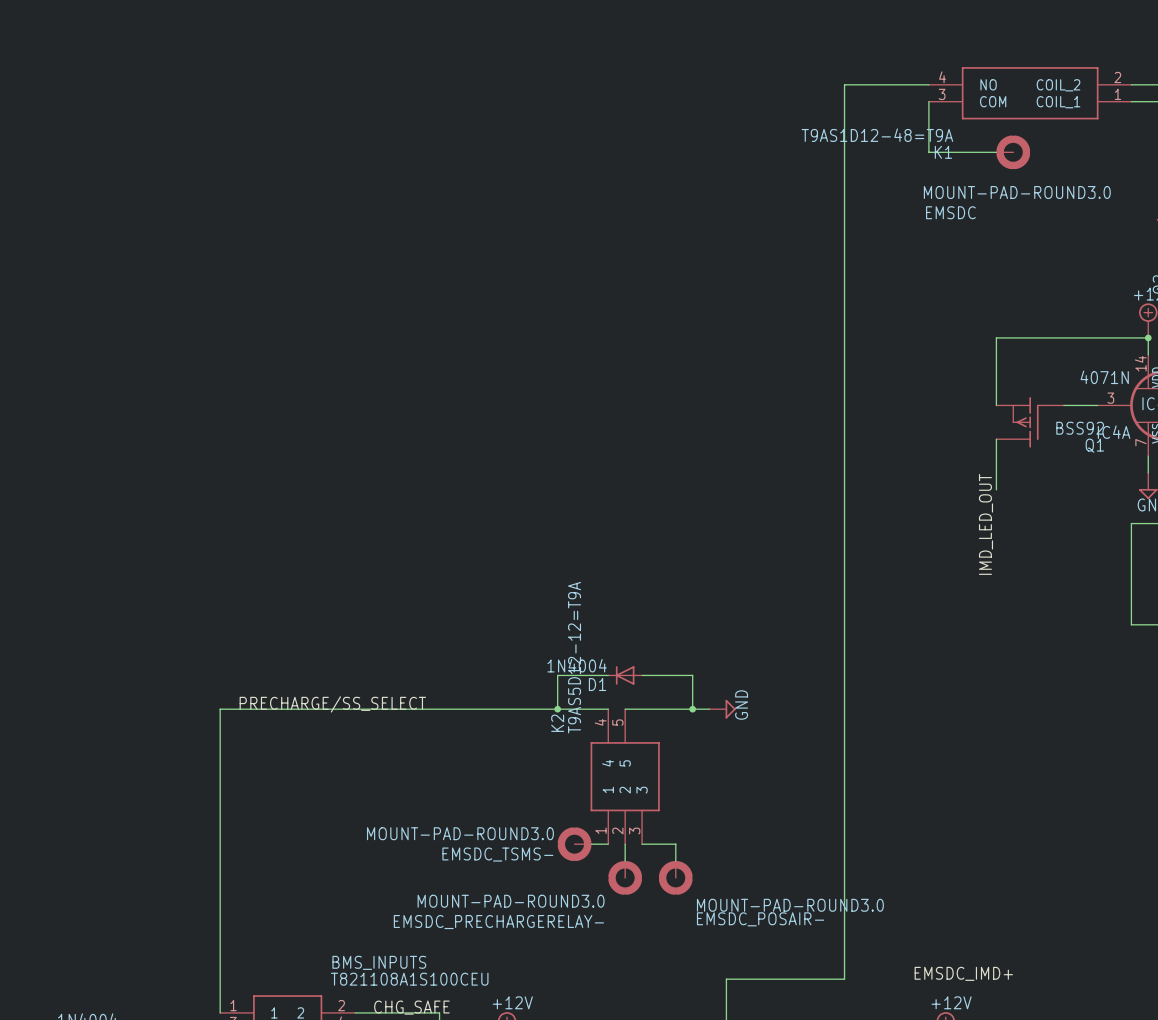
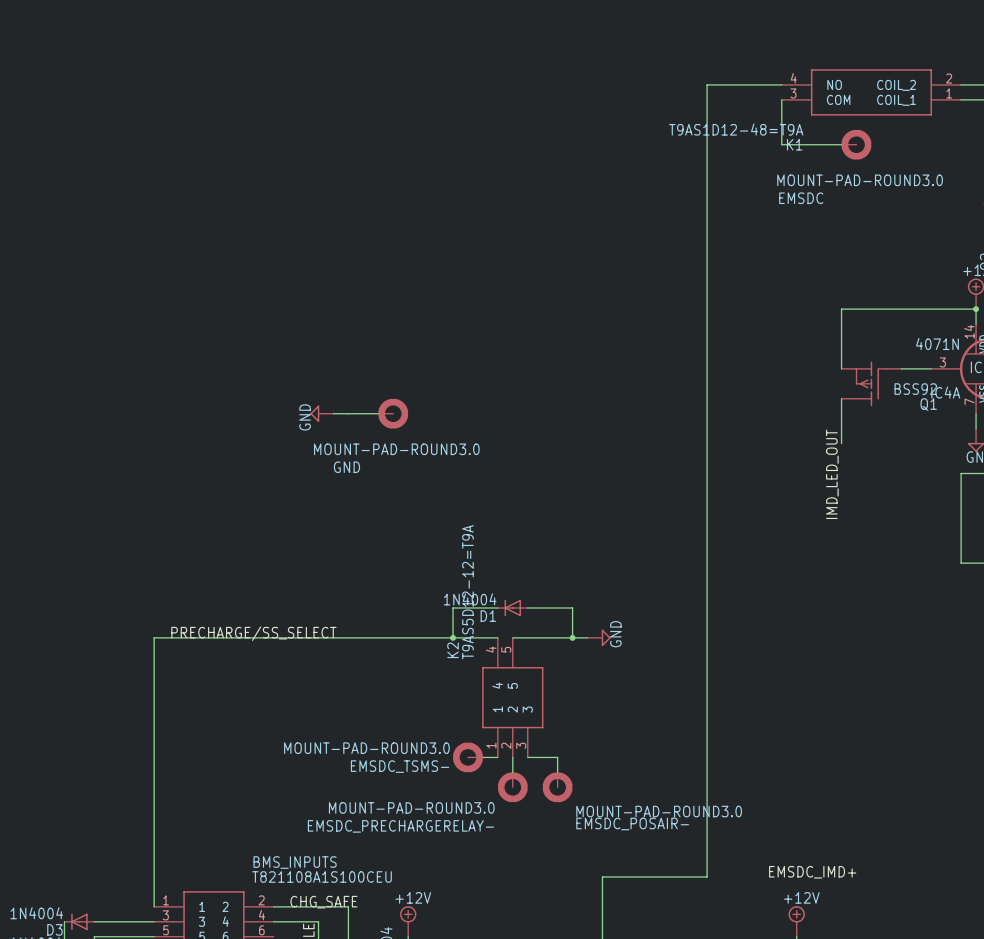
power symbol: none -> GND (321, 413)
wire: none -> (333, 413) (378, 413)
GND: none -> MOUNT-PAD-ROUND3.0 (393, 413)

